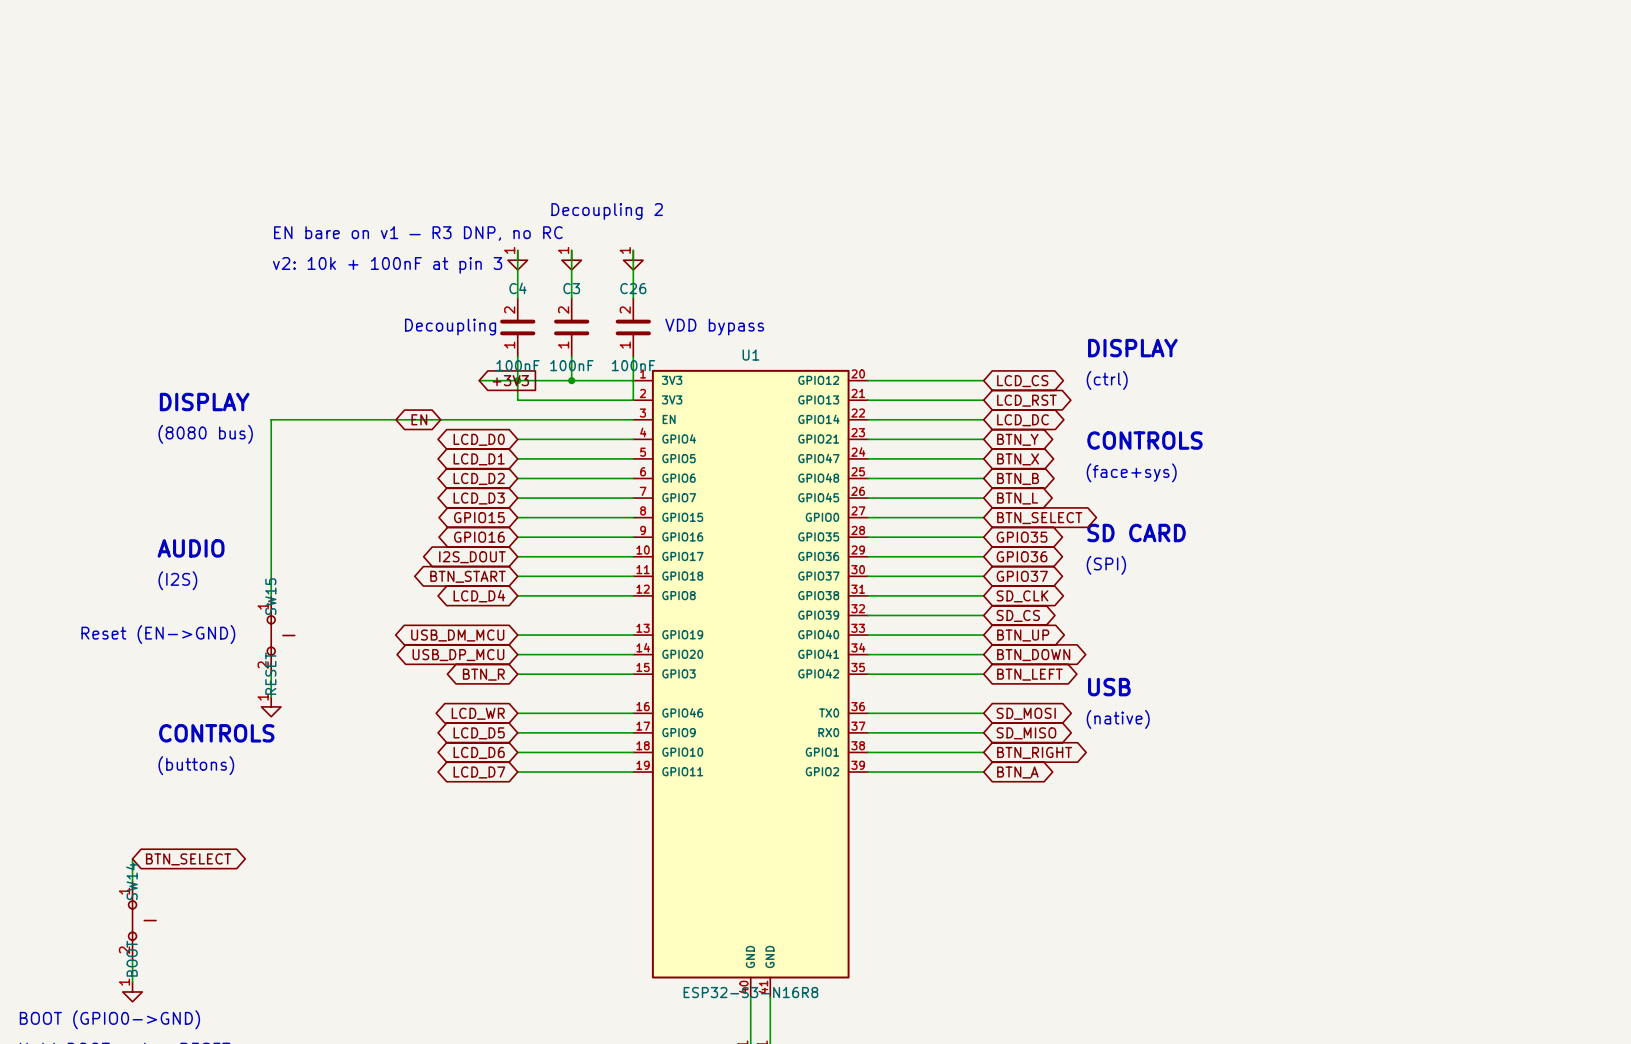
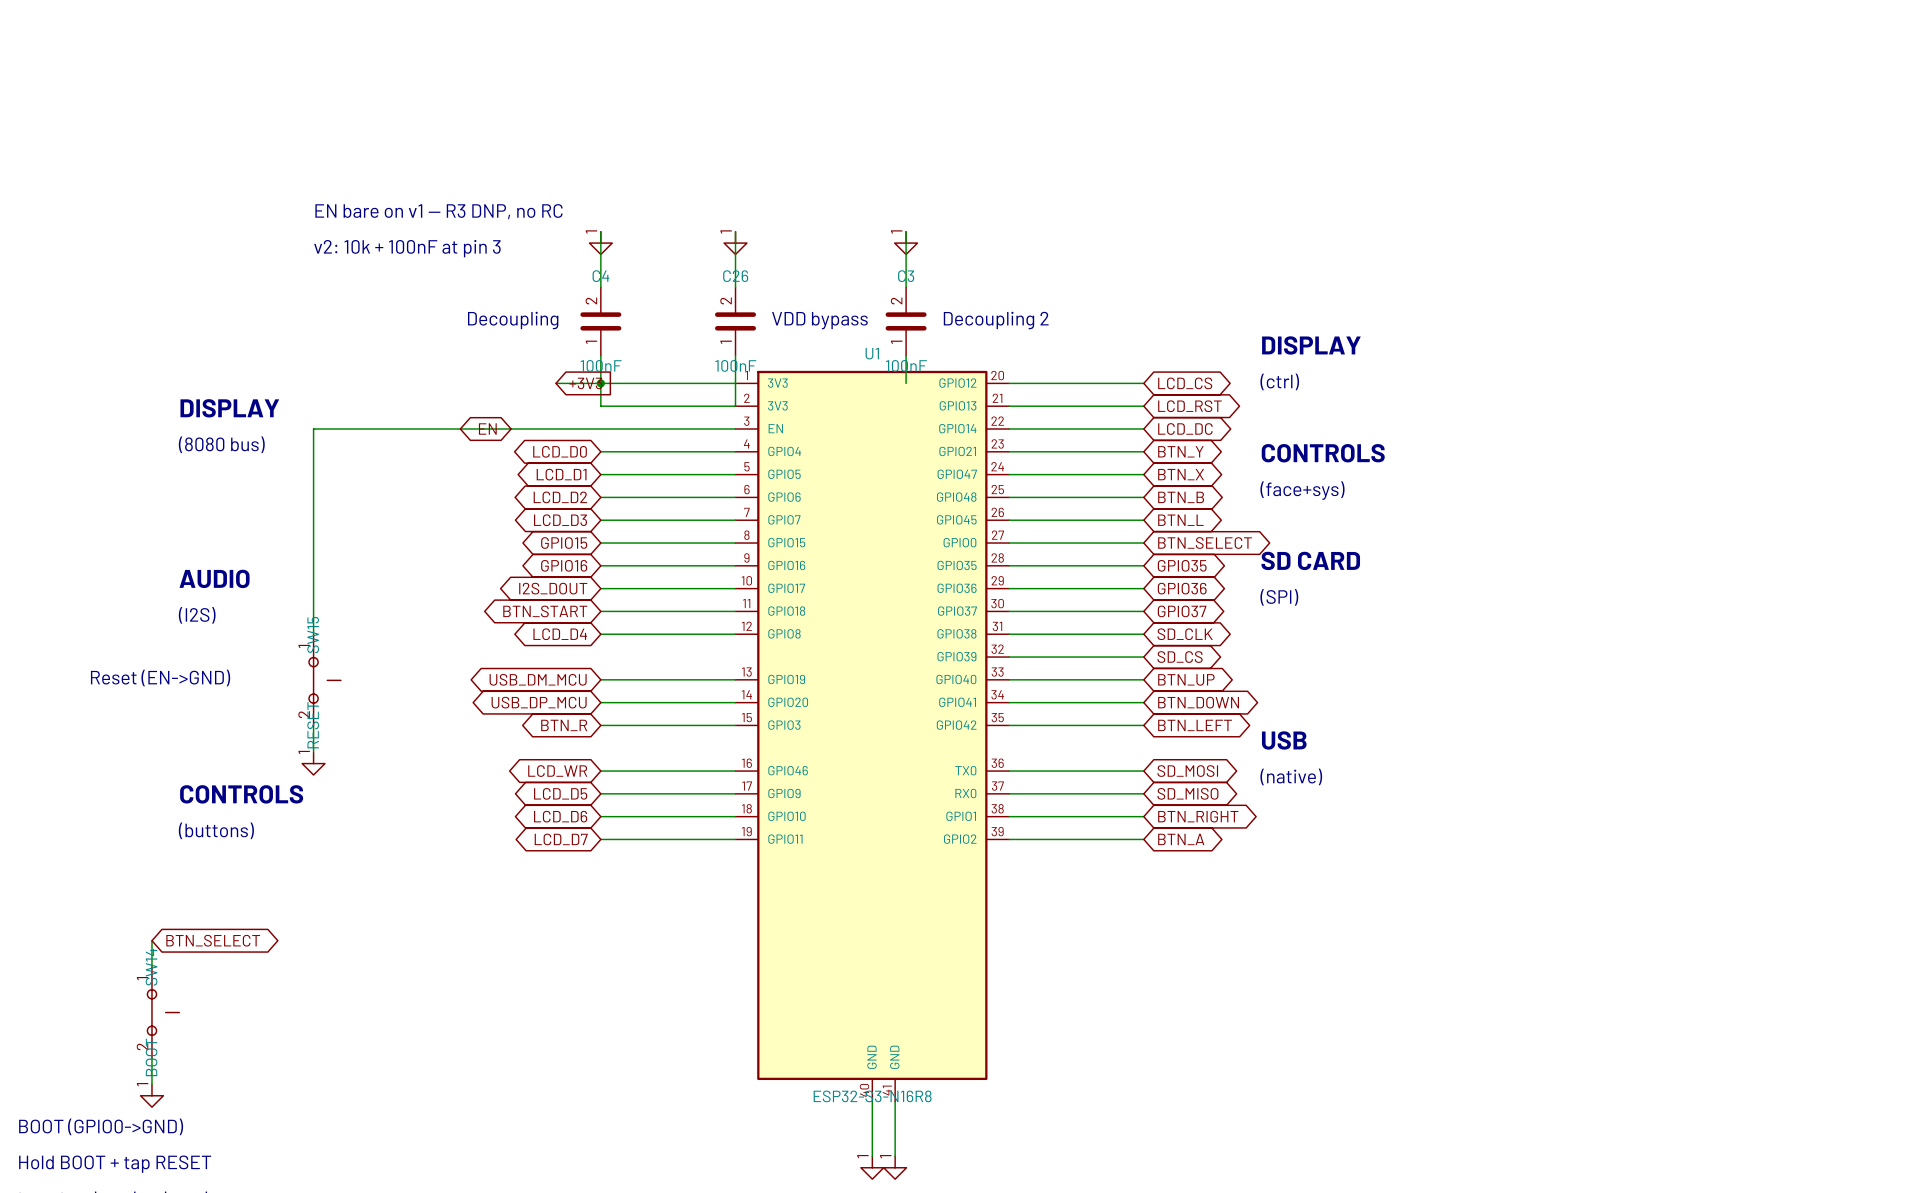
text: Decoupling 2 (607, 211) -> none
wire: (571, 250) (571, 298) -> none
wire: none -> (906, 231) (906, 287)
power symbol: (571, 260) -> none
power symbol: none -> (906, 243)
C3 position: (571, 327) -> (906, 321)
text: none -> Decoupling 2 (996, 320)
wire: (571, 356) (571, 380) -> none
wire: none -> (906, 355) (906, 383)
junction: (571, 380) -> none

